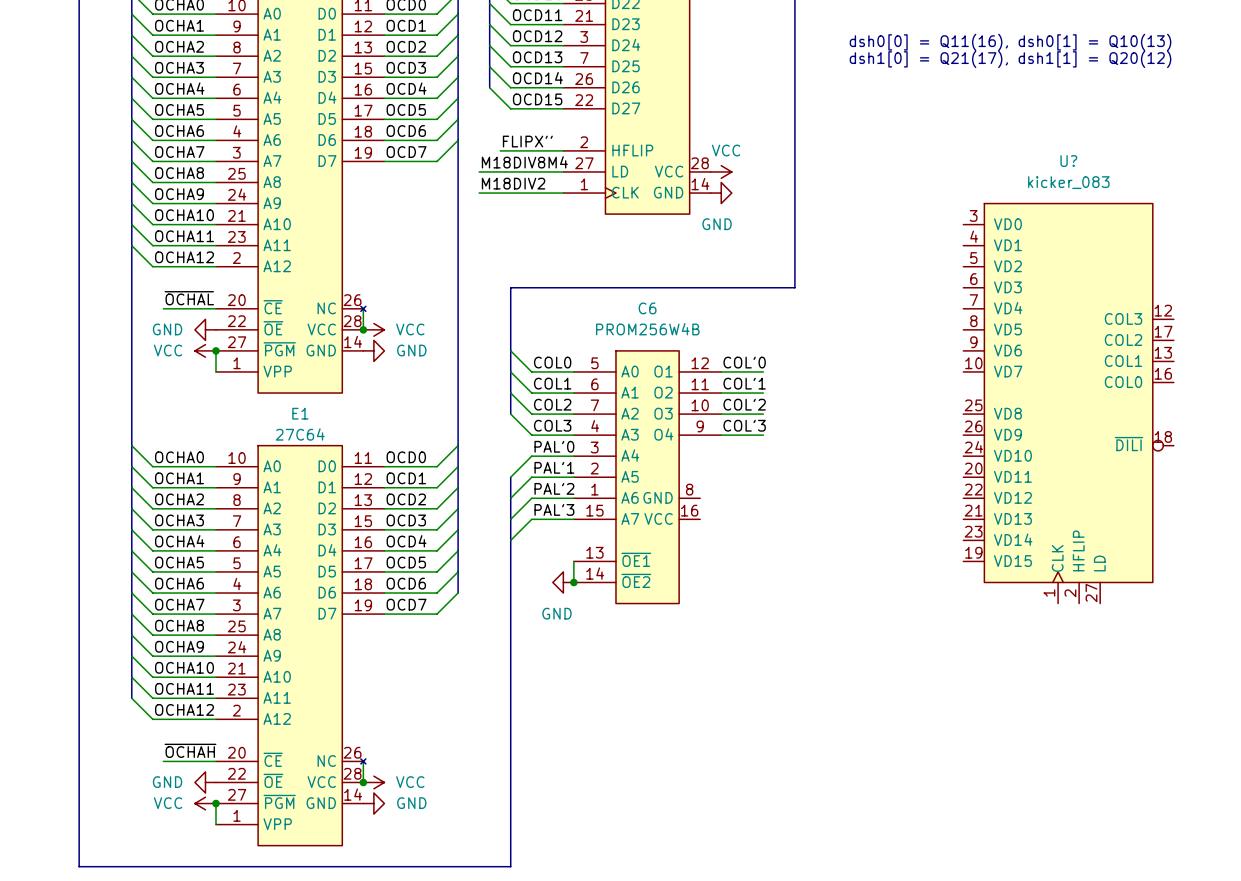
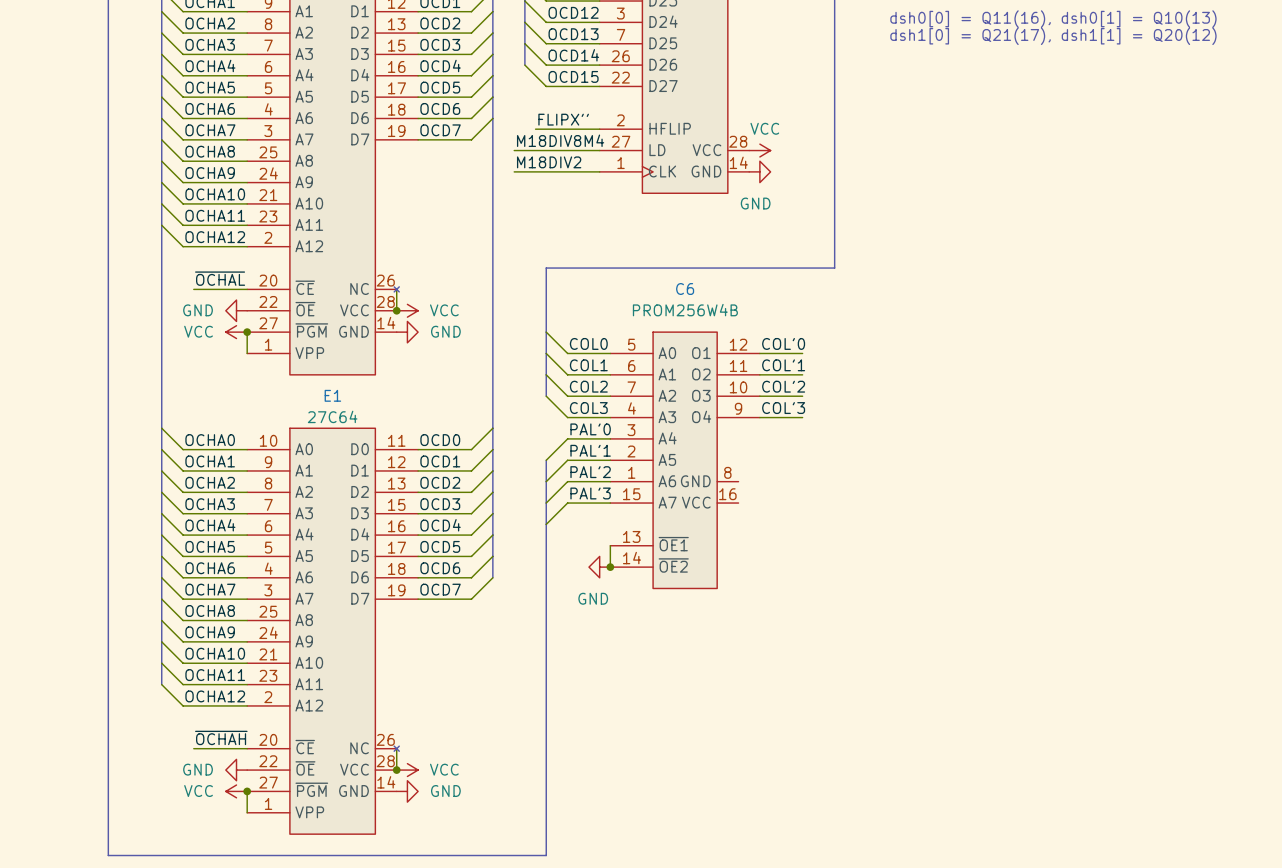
U?: kicker_083 (1068, 403) -> none

